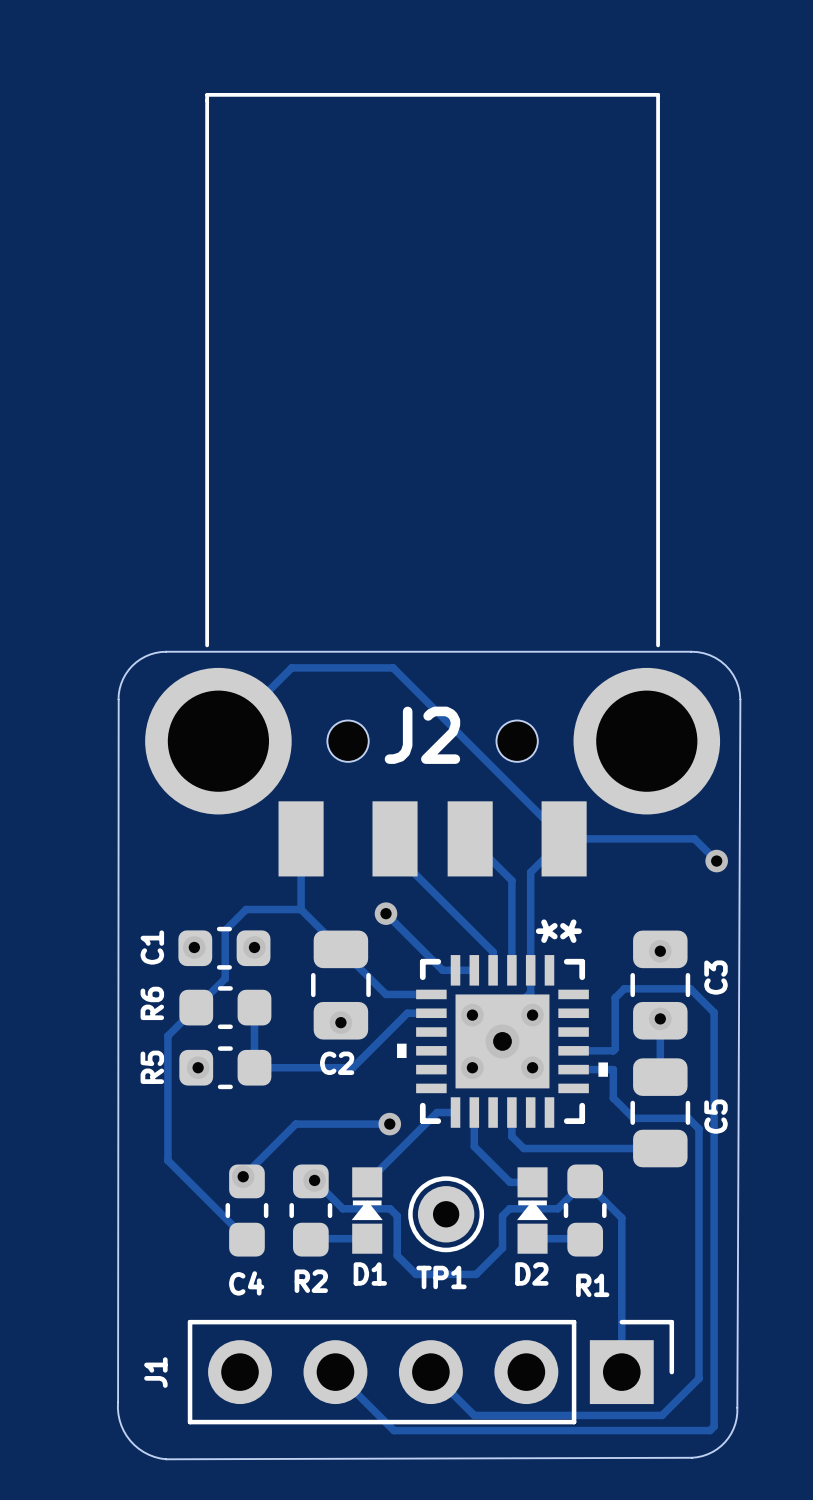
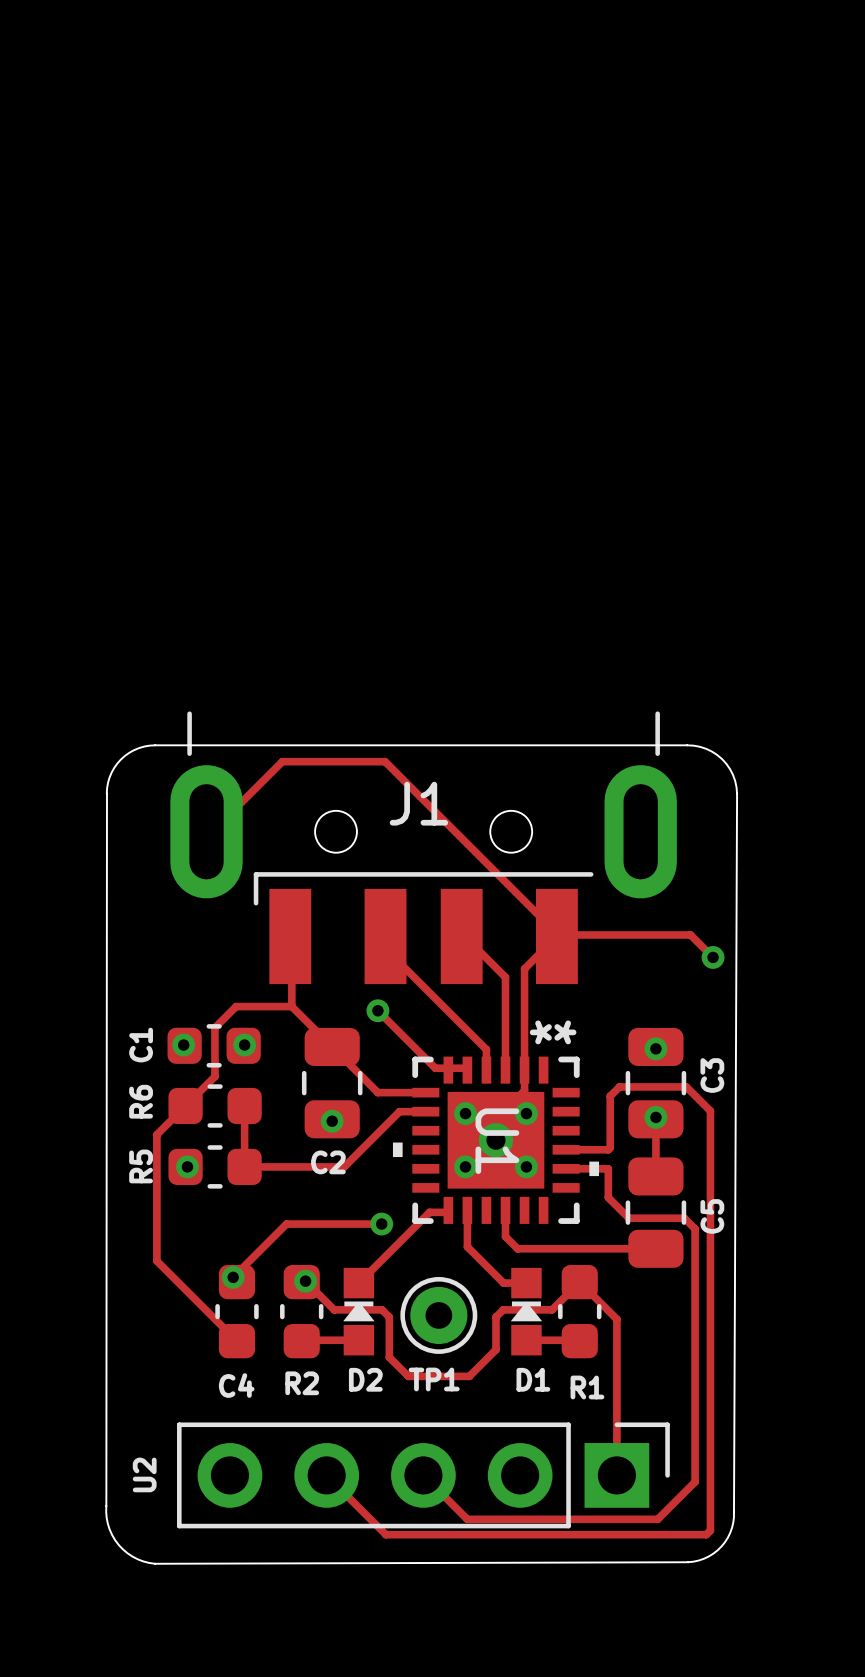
J2: (432, 484) -> none
J1: none -> (423, 847)
part: (502, 1041) -> none
U1: none -> (495, 1140)
D1 name: D1 (370, 1273) -> D2 (365, 1379)
D2 name: D2 (531, 1273) -> D1 (533, 1379)
J1 name: J1 (155, 1372) -> U2 (144, 1474)

